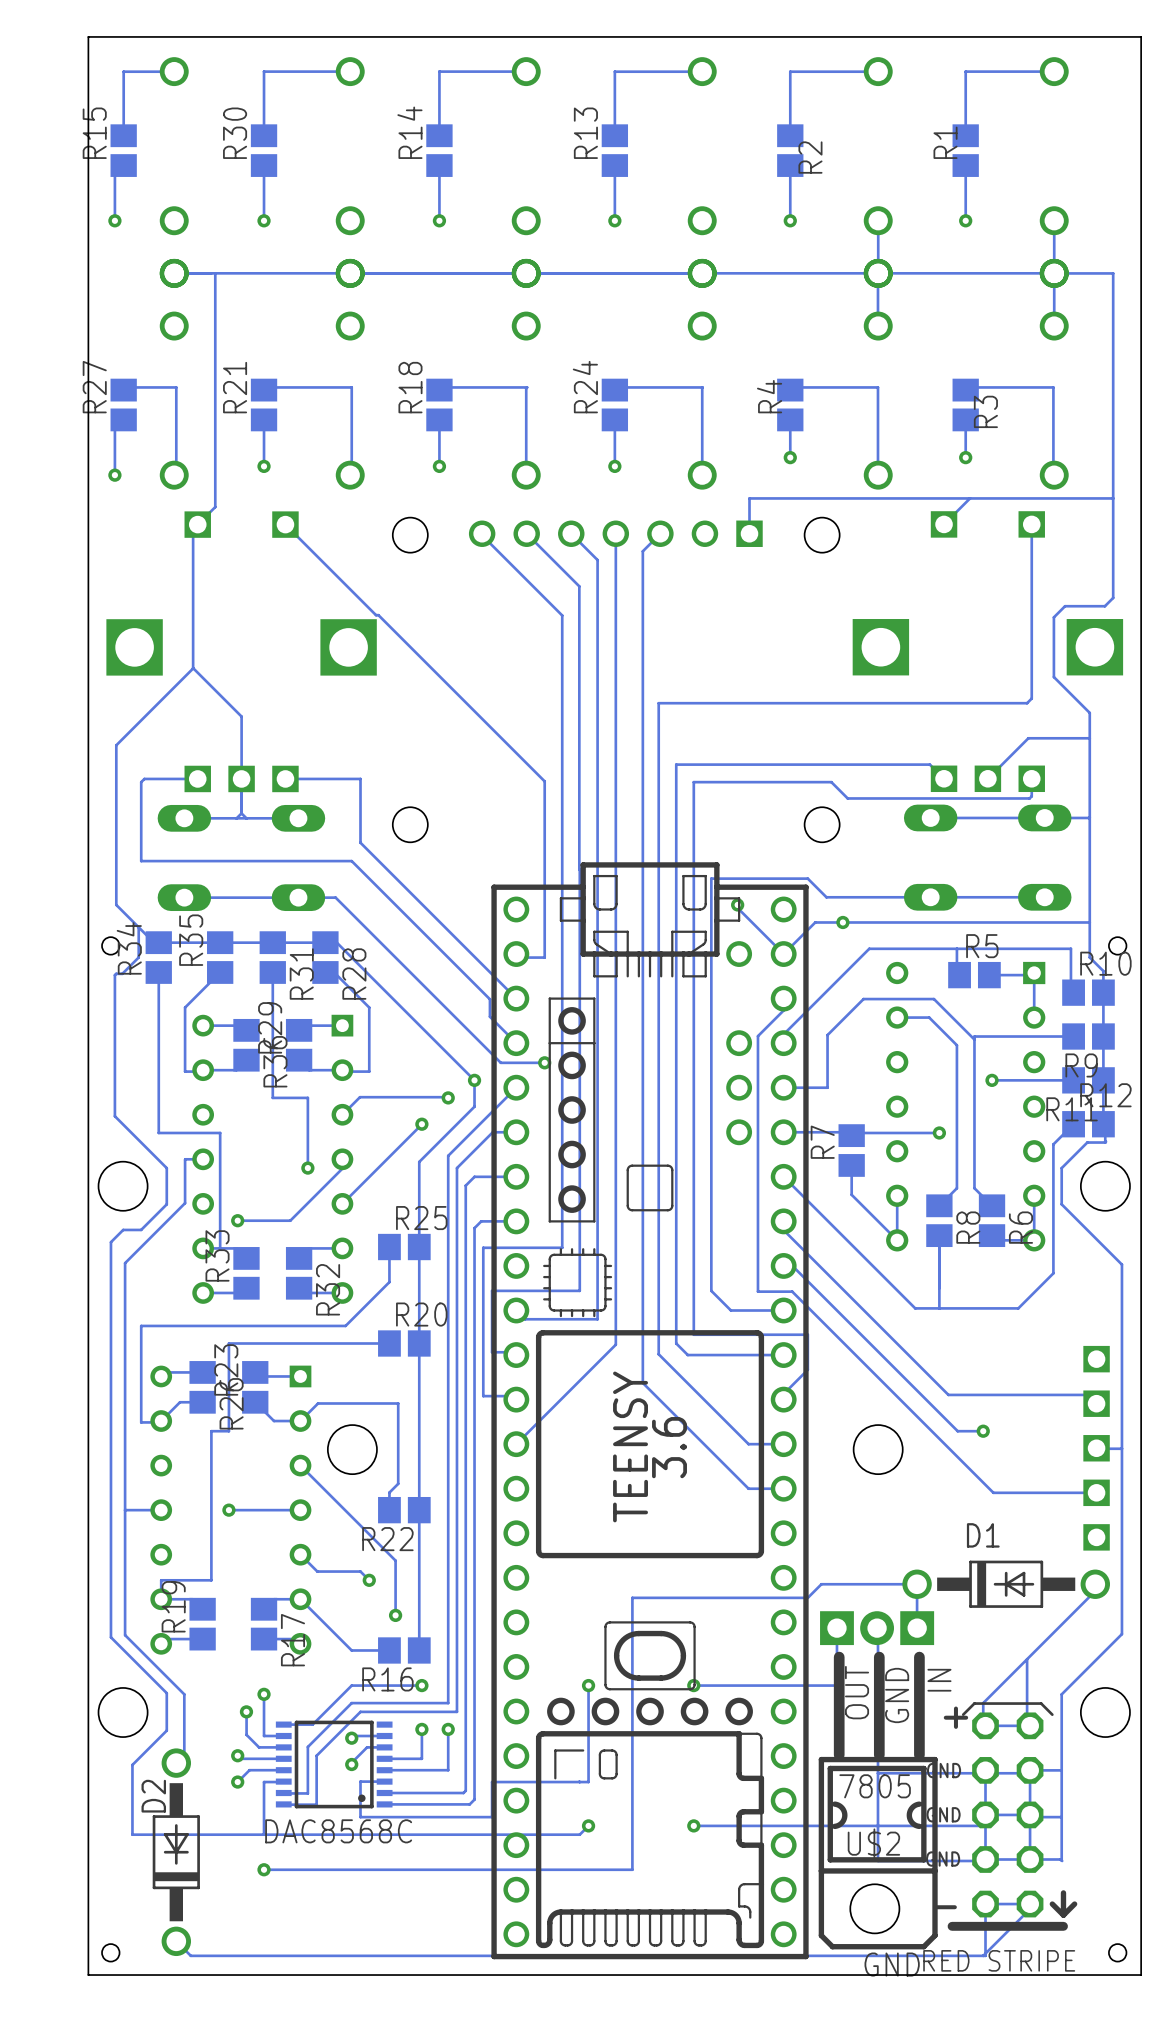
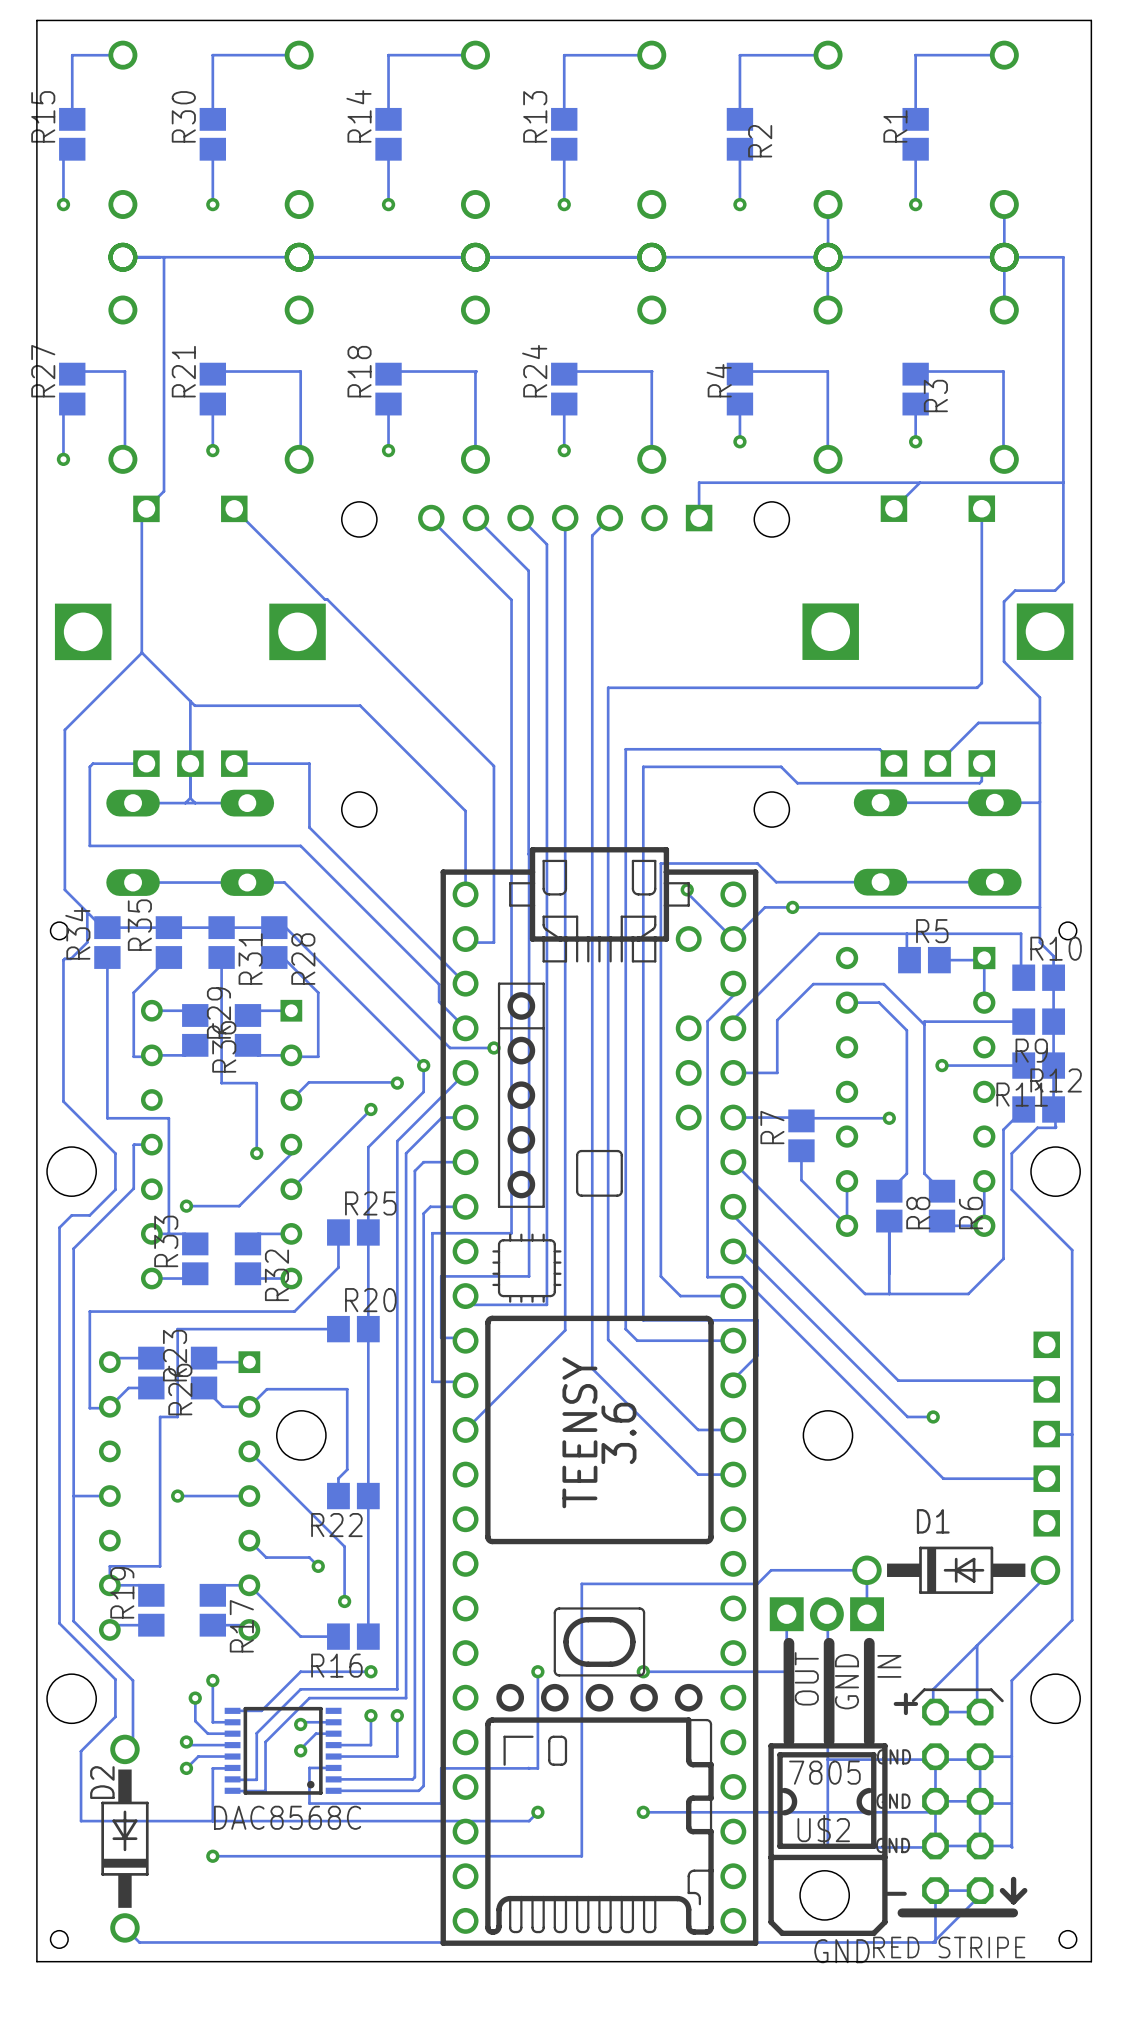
track: none -> (190, 701) (194, 705) (360, 705) (465, 811) (465, 894)

